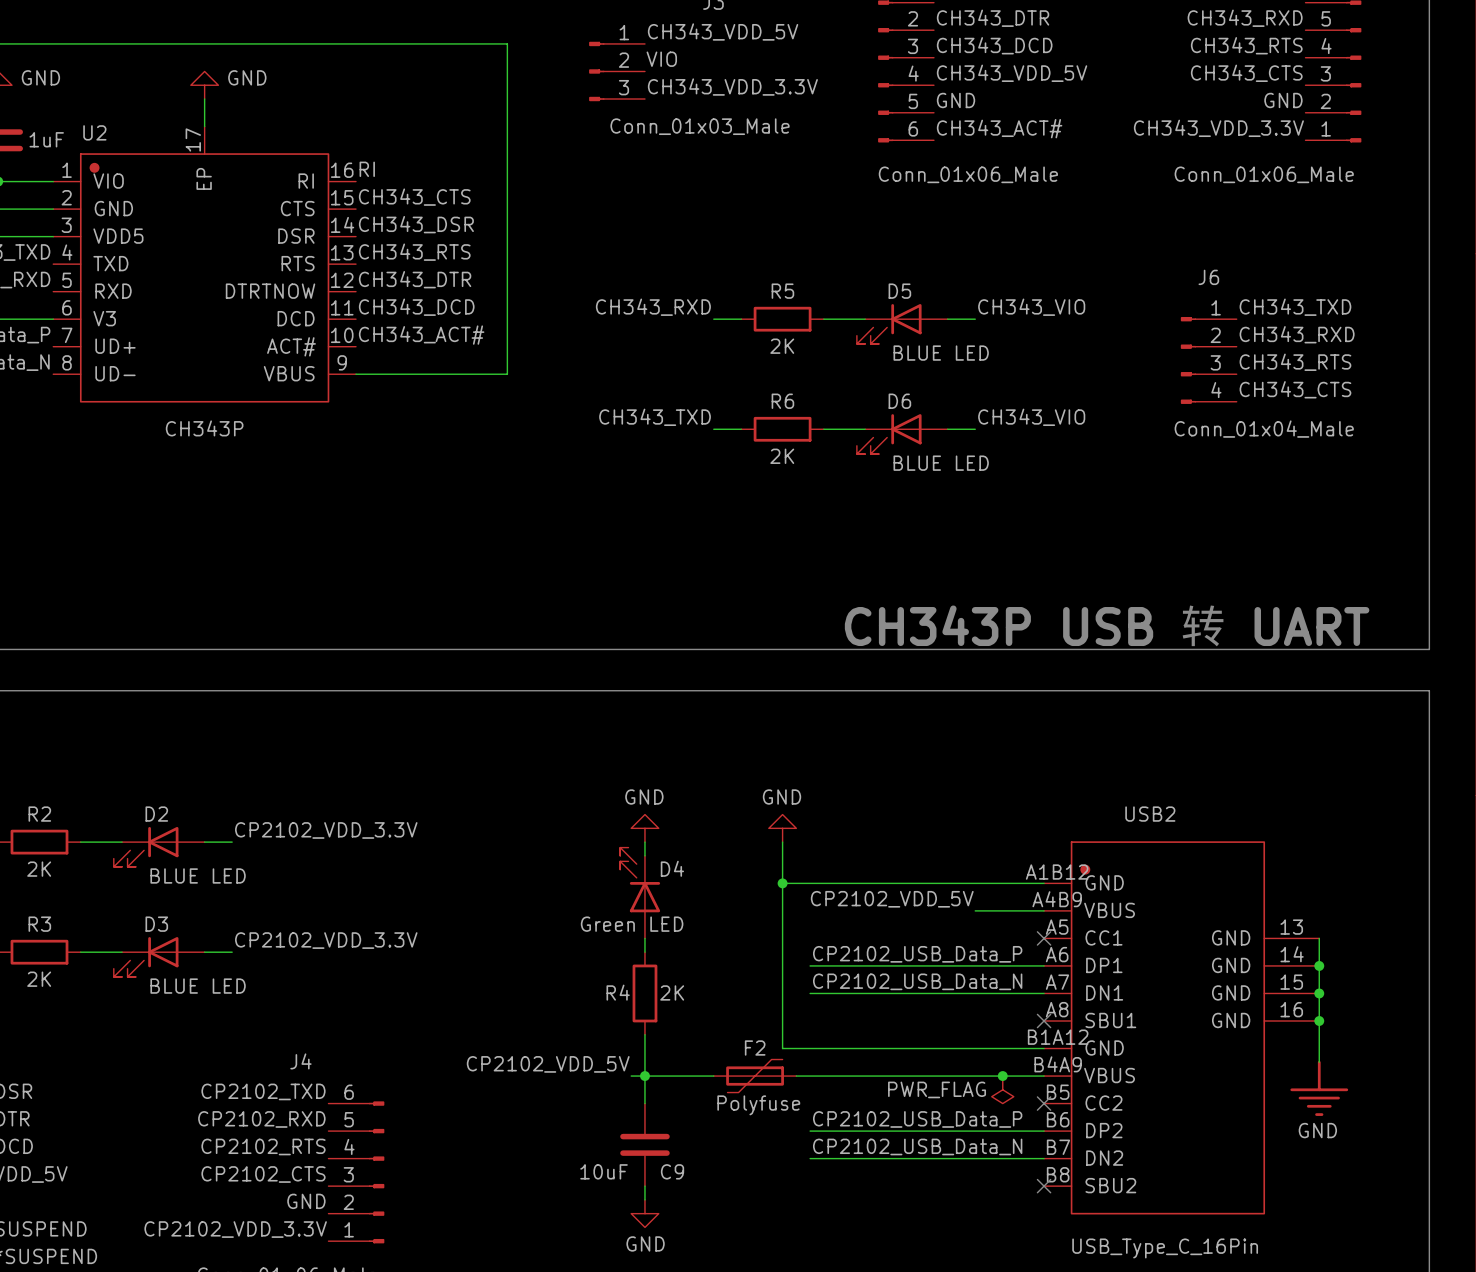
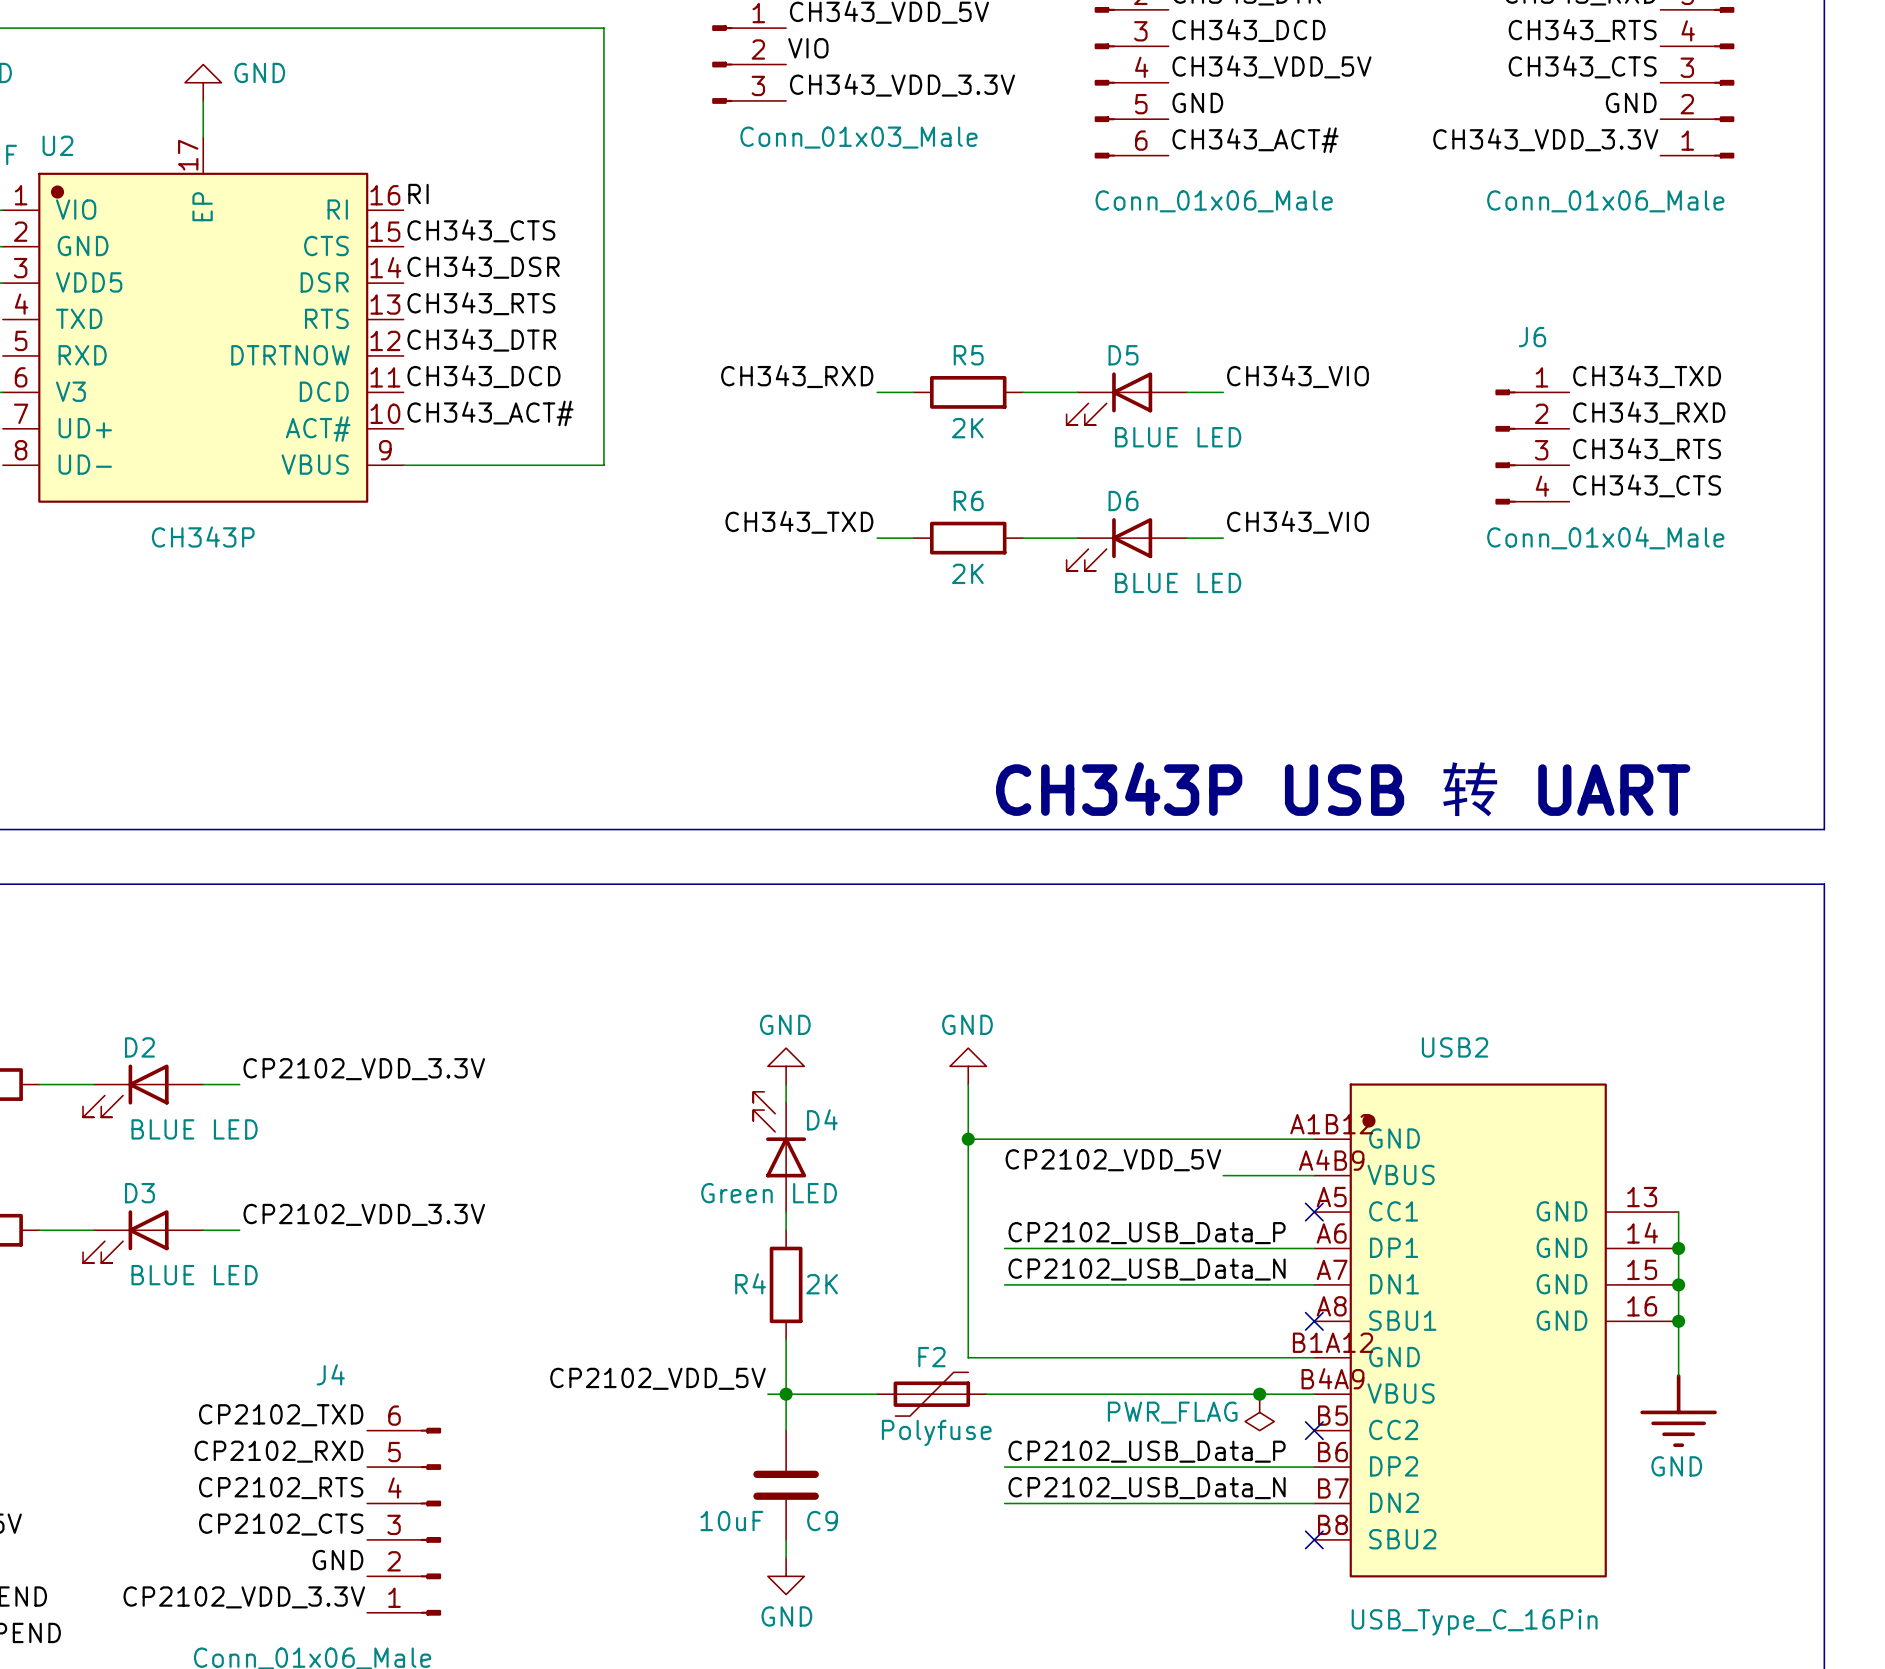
text position: CH343P USB 转 UART (1107, 625) -> CH343P USB 转 UART (1343, 789)

